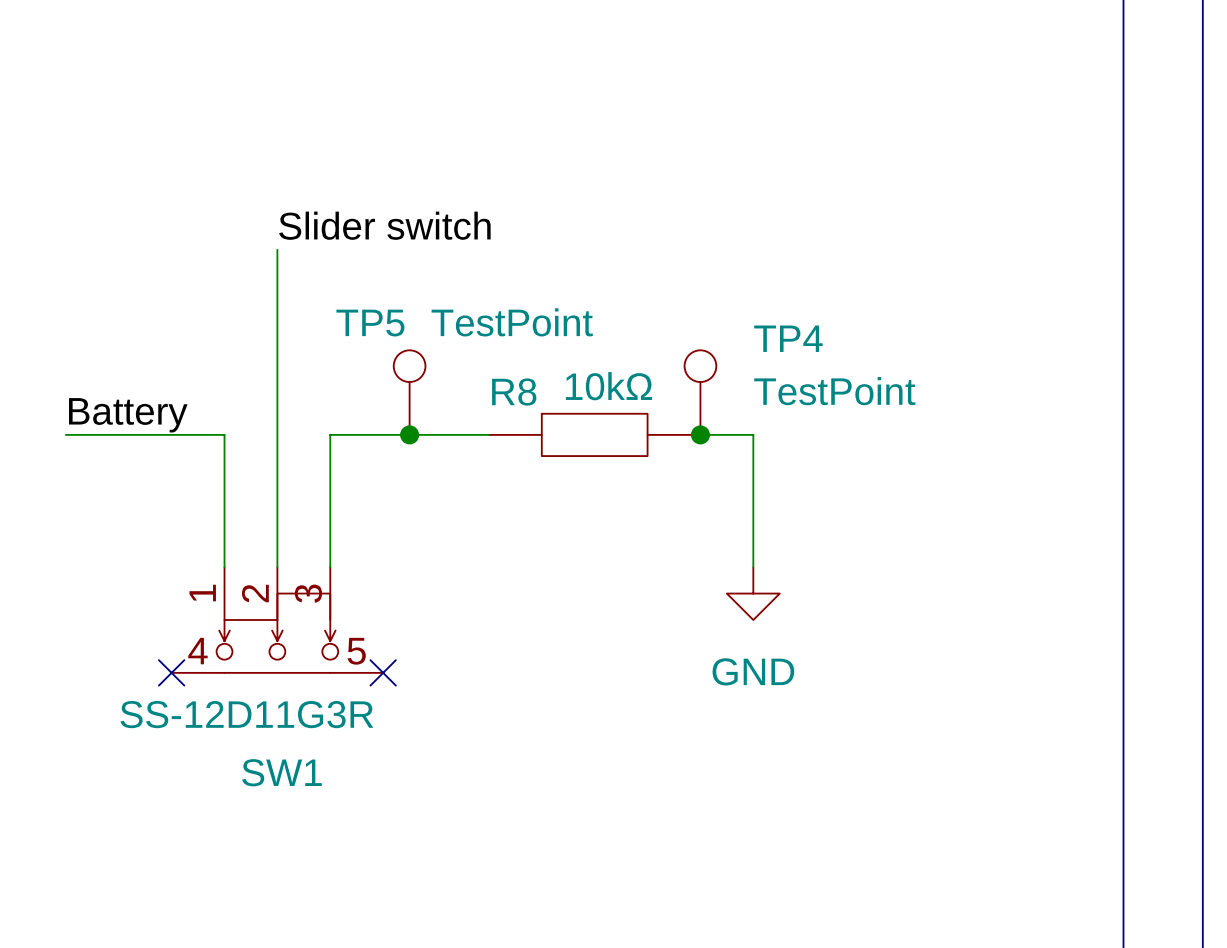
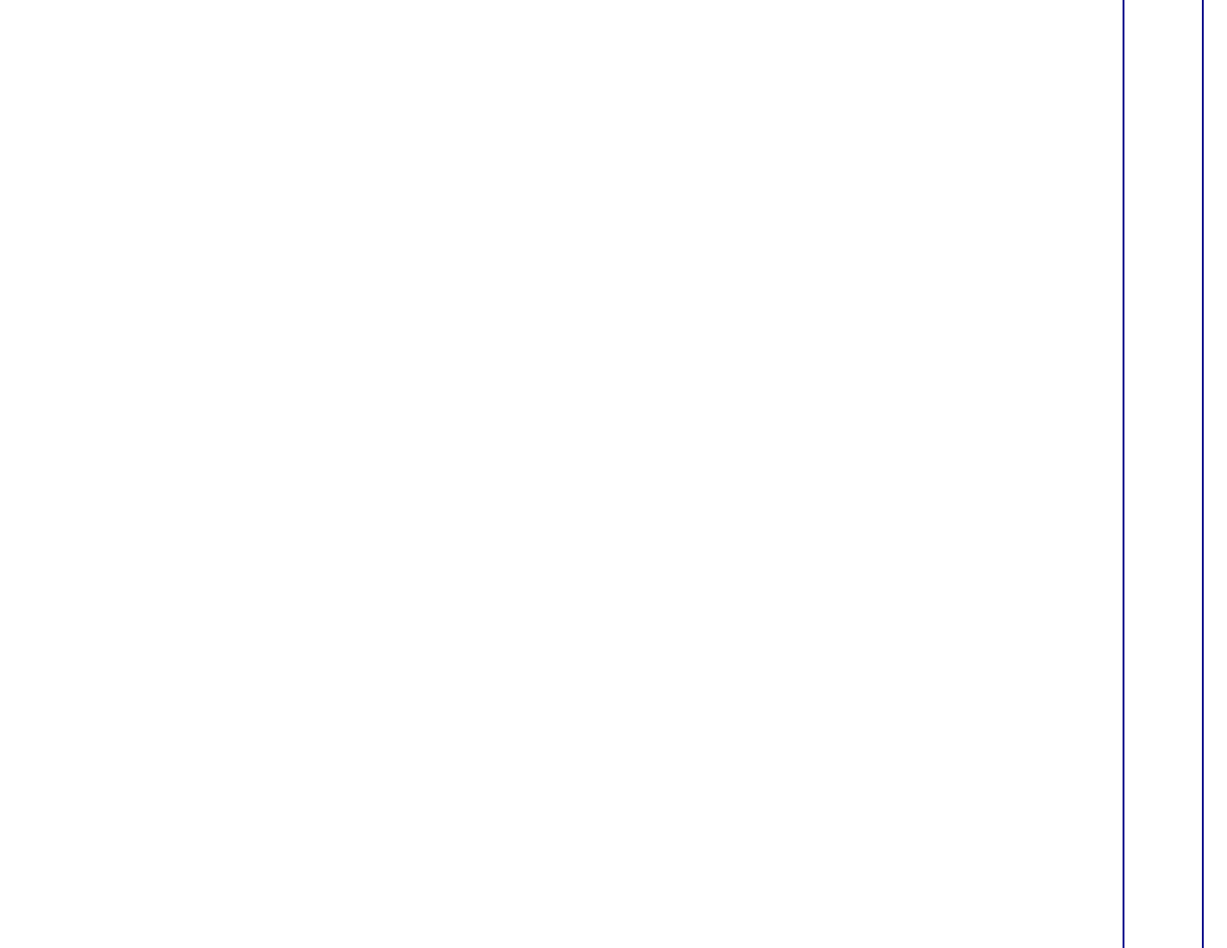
label: Slider switch (384, 225) -> none
wire: (277, 249) (277, 567) -> none
TP5: TestPoint (409, 392) -> none
TP4: TestPoint (700, 392) -> none
label: Battery (128, 415) -> none
wire: (65, 434) (224, 434) (224, 567) -> none
junction: (409, 434) -> none
wire: (488, 434) (330, 434) (330, 567) -> none
R8: 10kΩ (594, 434) -> none
wire: (700, 434) (753, 434) (753, 567) -> none
junction: (700, 434) -> none
power symbol: GND (753, 593) -> none
SW1: SS-12D11G3R (277, 620) -> none
no-connect mark: (171, 672) -> none
no-connect mark: (383, 672) -> none

